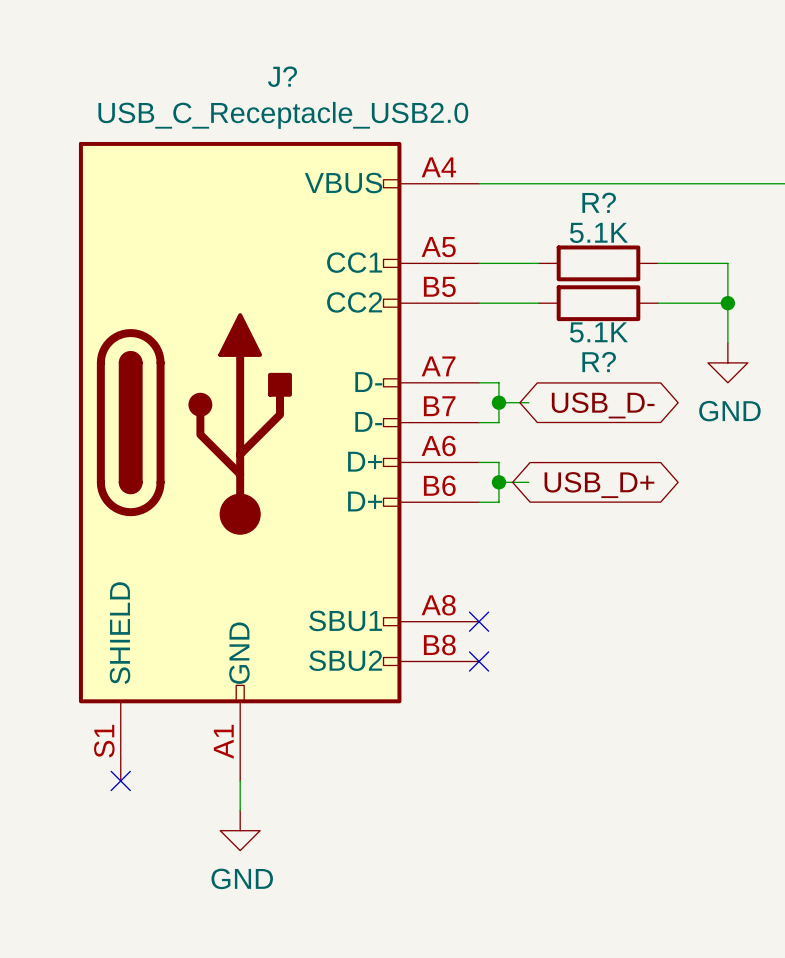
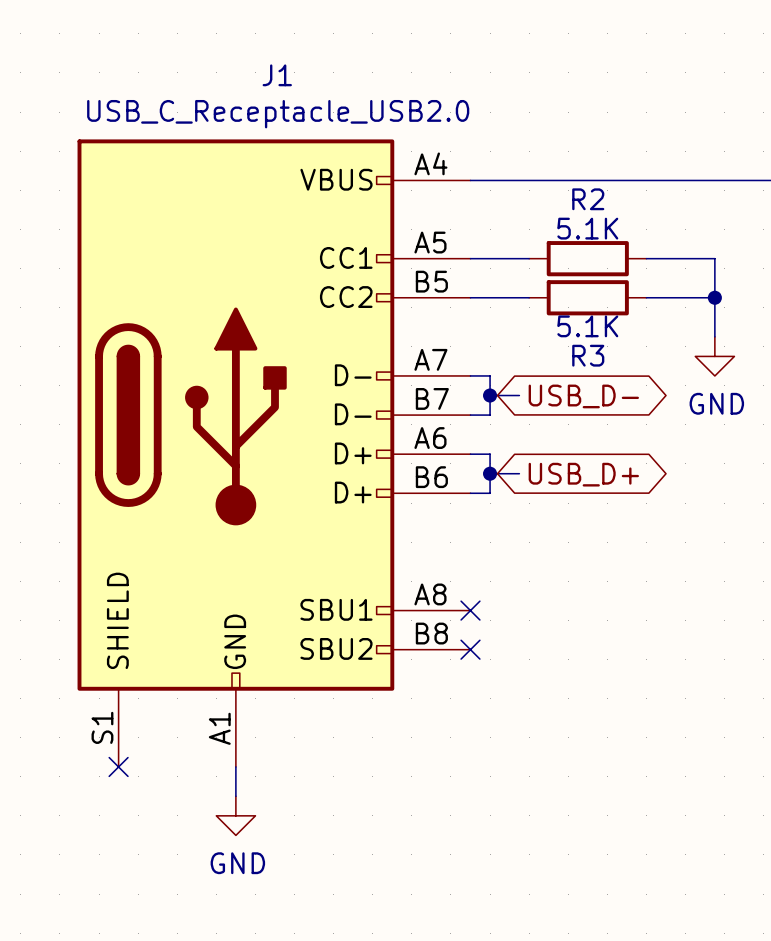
J? name: J? (282, 76) -> J1 (277, 75)
R? name: R? (599, 202) -> R2 (588, 199)
R? name: R? (599, 362) -> R3 (588, 355)

